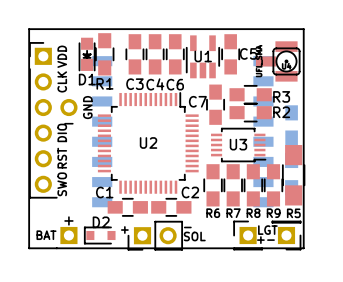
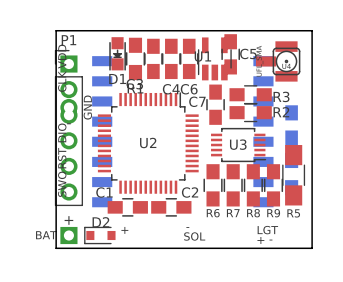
D1 position: (87, 54) -> (117, 53)
R1 position: (104, 54) -> (135, 58)
C3 position: (134, 54) -> (153, 58)
C4 position: (155, 54) -> (171, 58)
C6 position: (175, 54) -> (189, 58)
U1 position: (202, 56) -> (214, 58)
part: (43, 120) -> none
P1: none -> (68, 128)
part: (155, 235) -> none
part: (248, 235) -> none
part: (286, 235) -> none
board edge: (56, 248) (29, 248) (29, 29) (303, 29) (303, 248) -> (56, 248) (56, 30) (312, 30) (312, 248) (303, 248)

